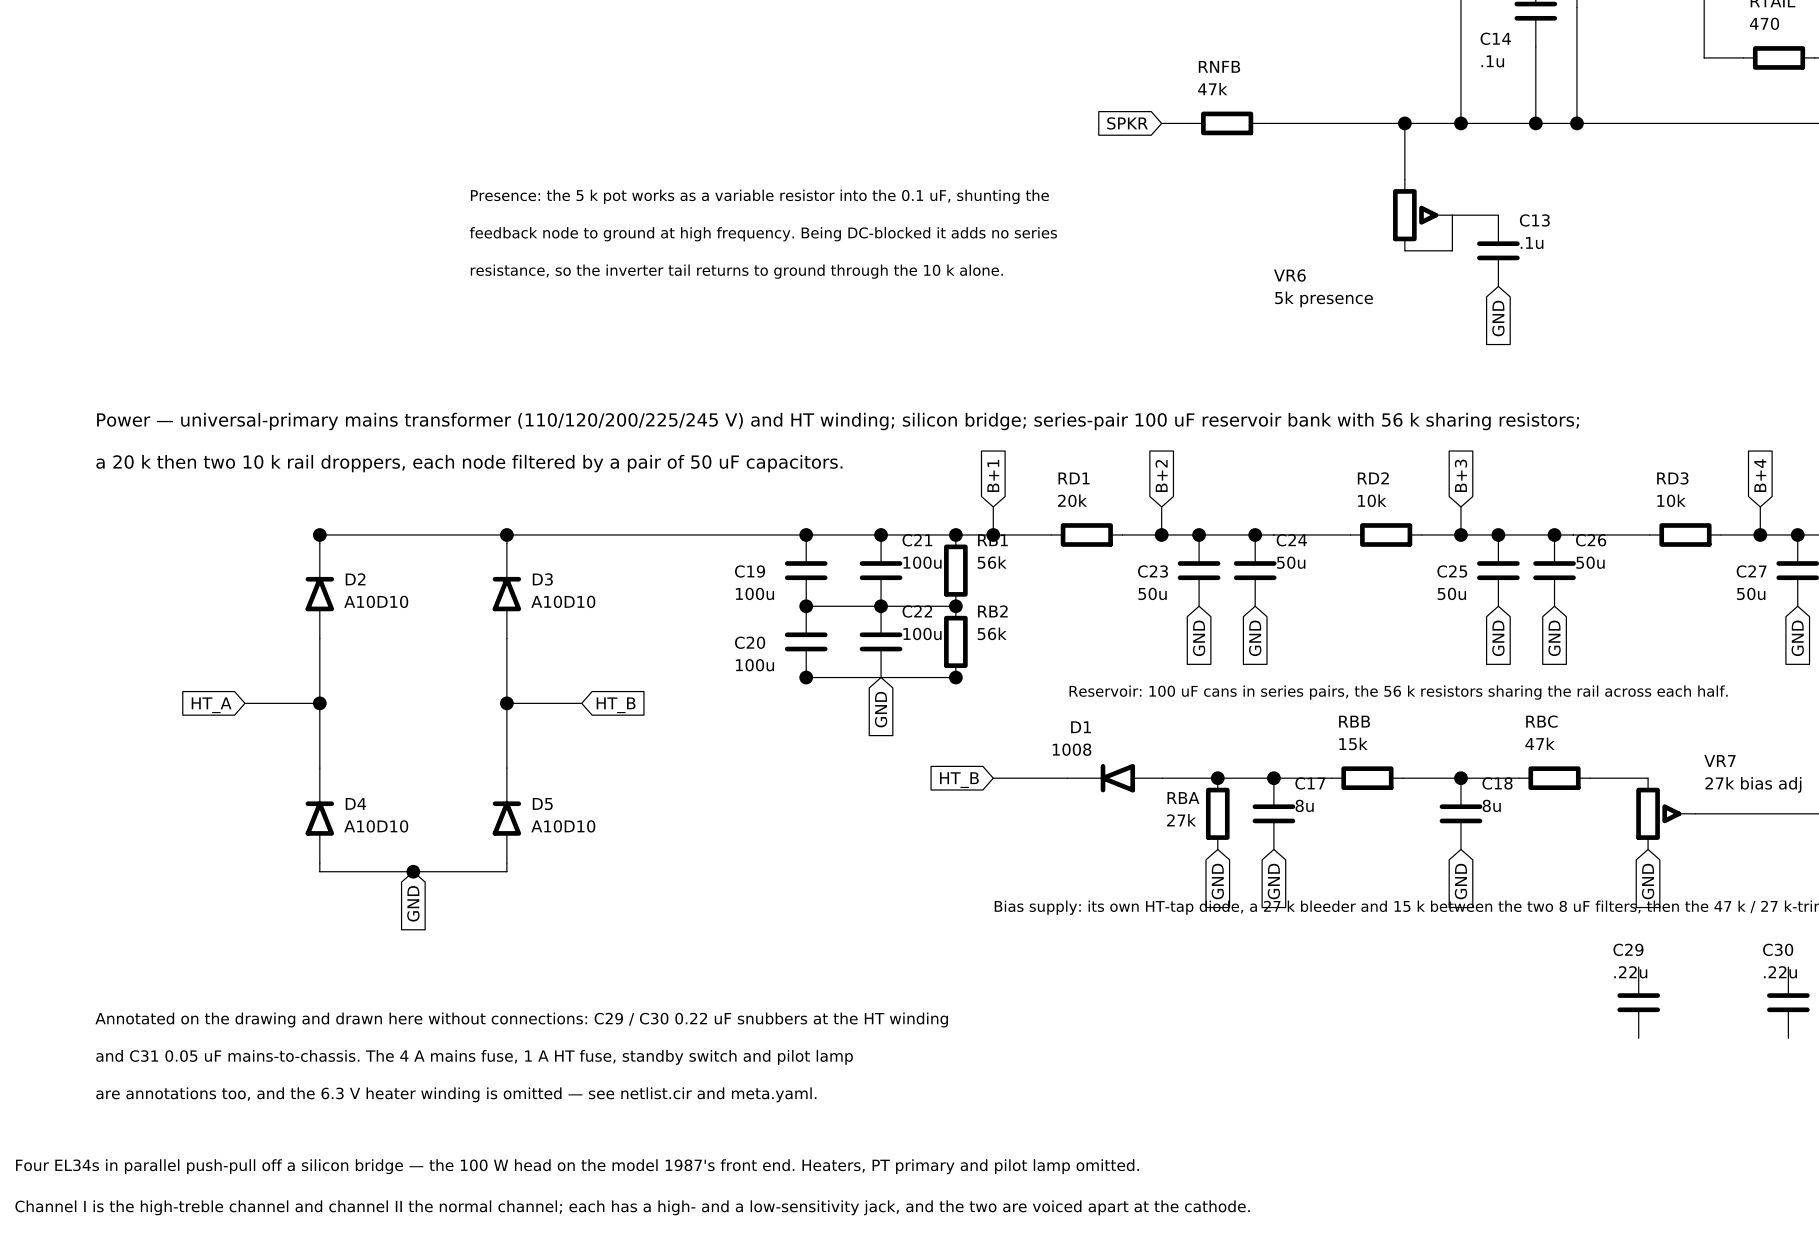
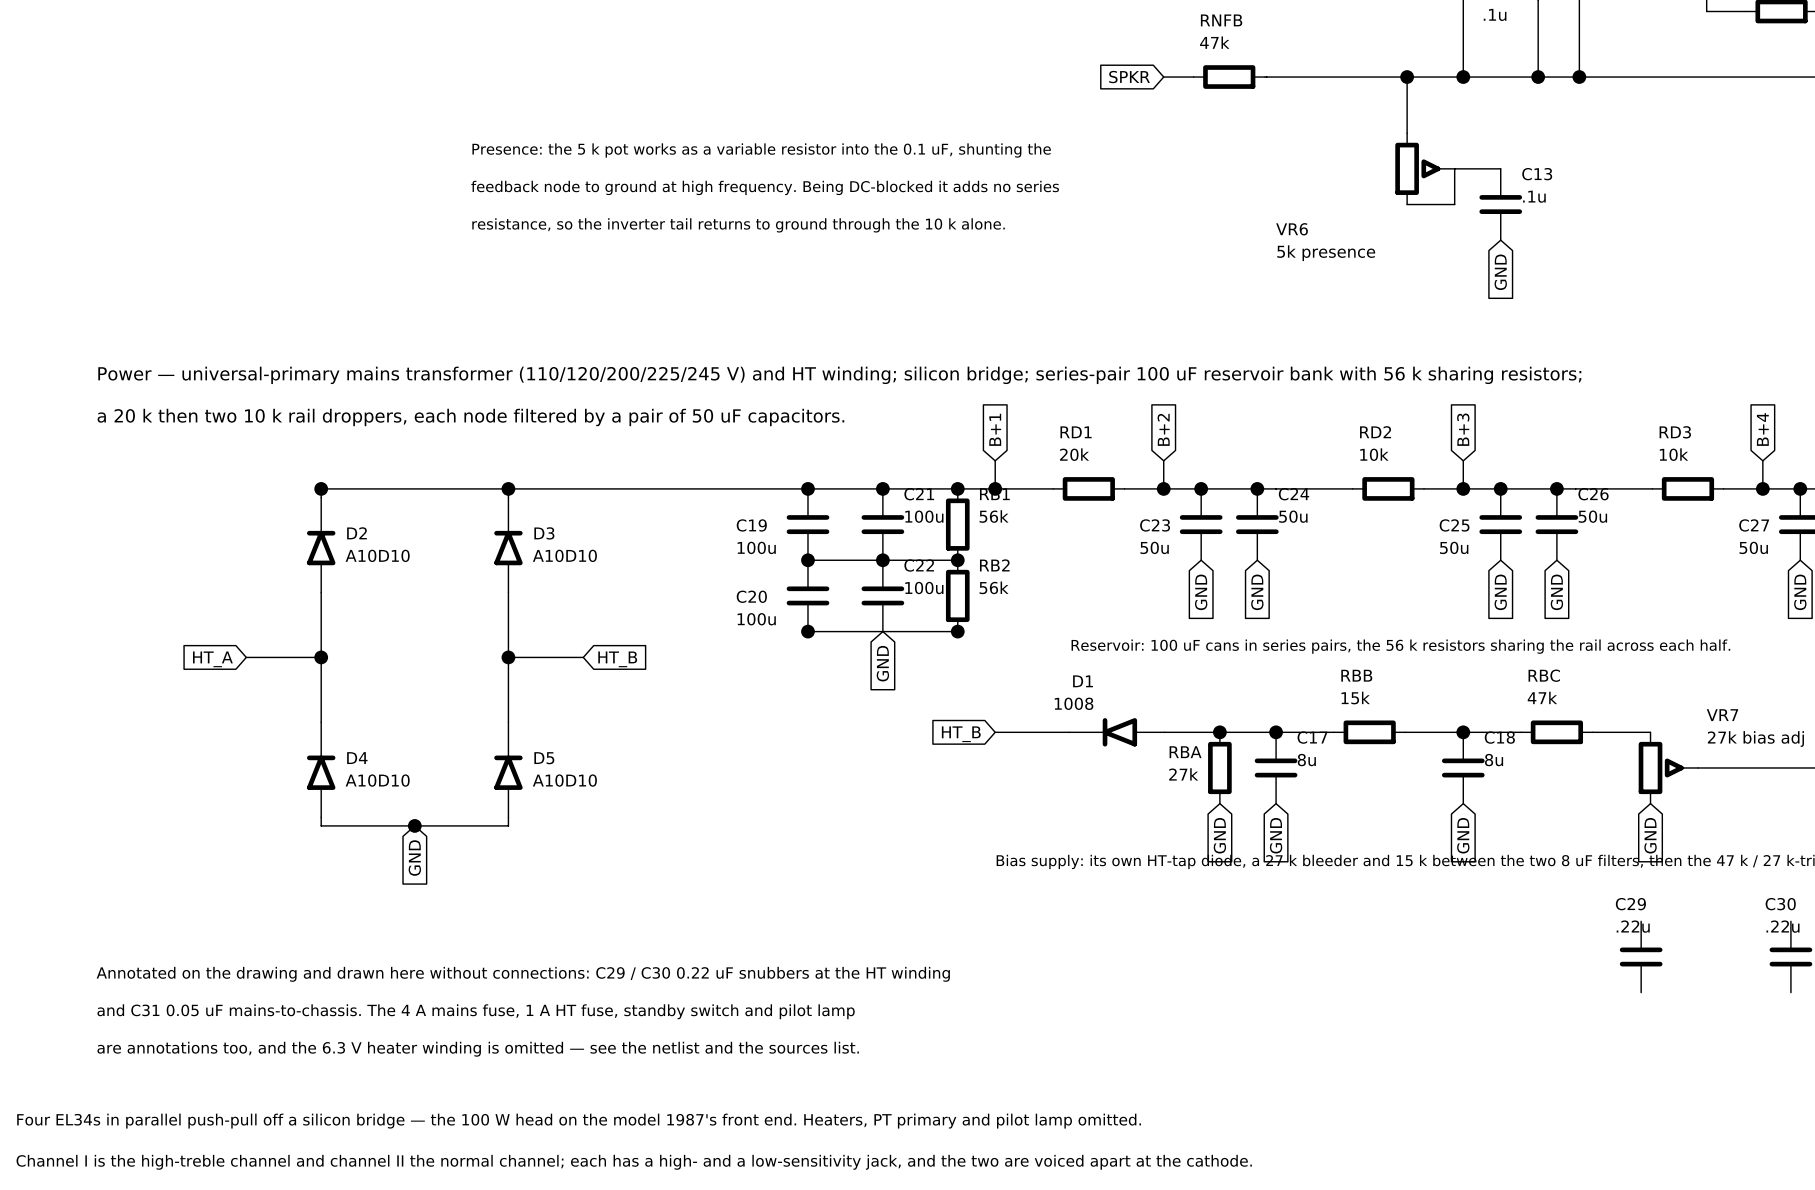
text: are annotations too, and the 6.3 V heater winding is omitted — see netlist.cir and meta.yaml. (456, 1094) -> are annotations too, and the 6.3 V heater winding is omitted — see the netlist and the sources list. (478, 1049)

